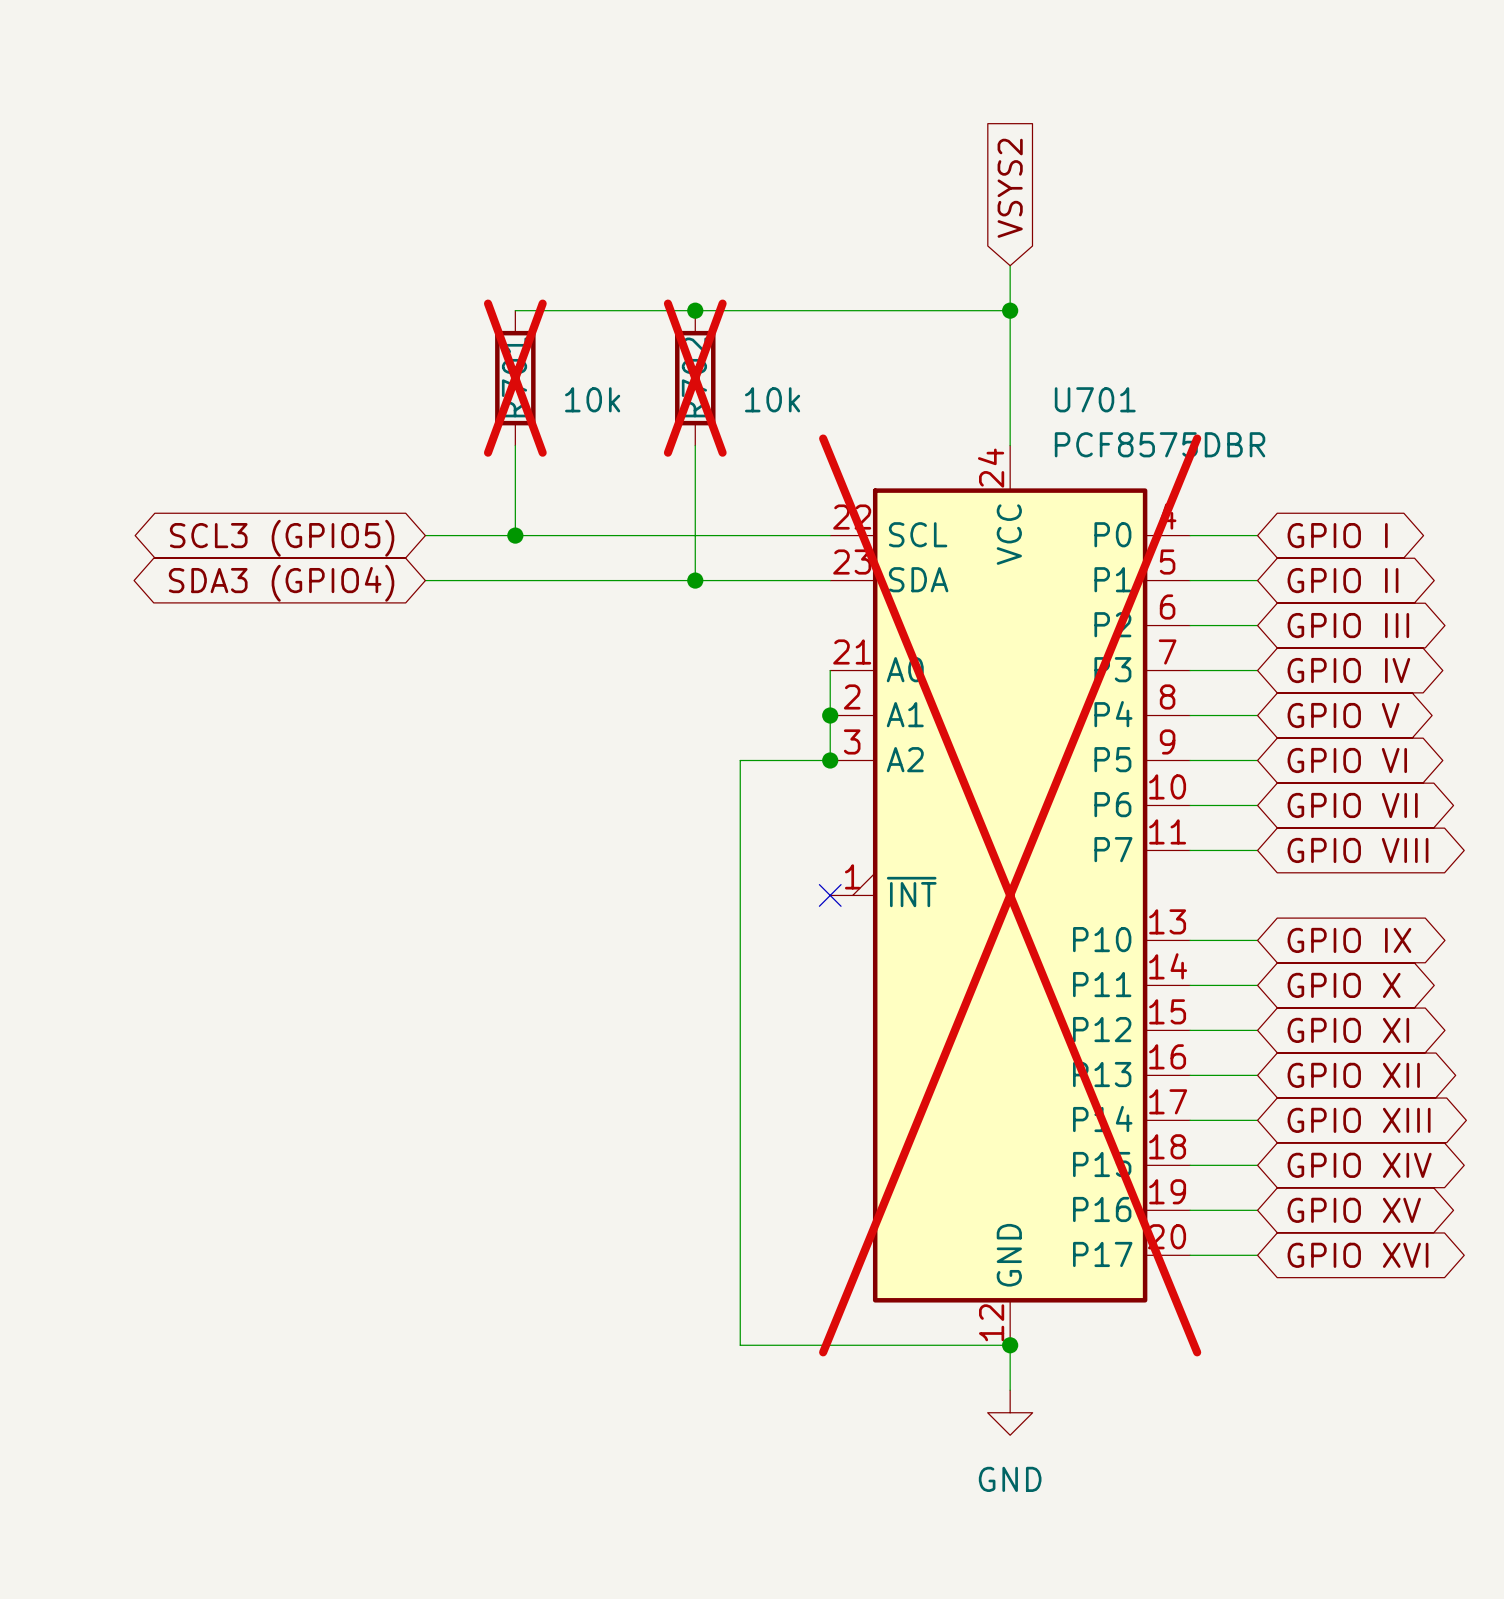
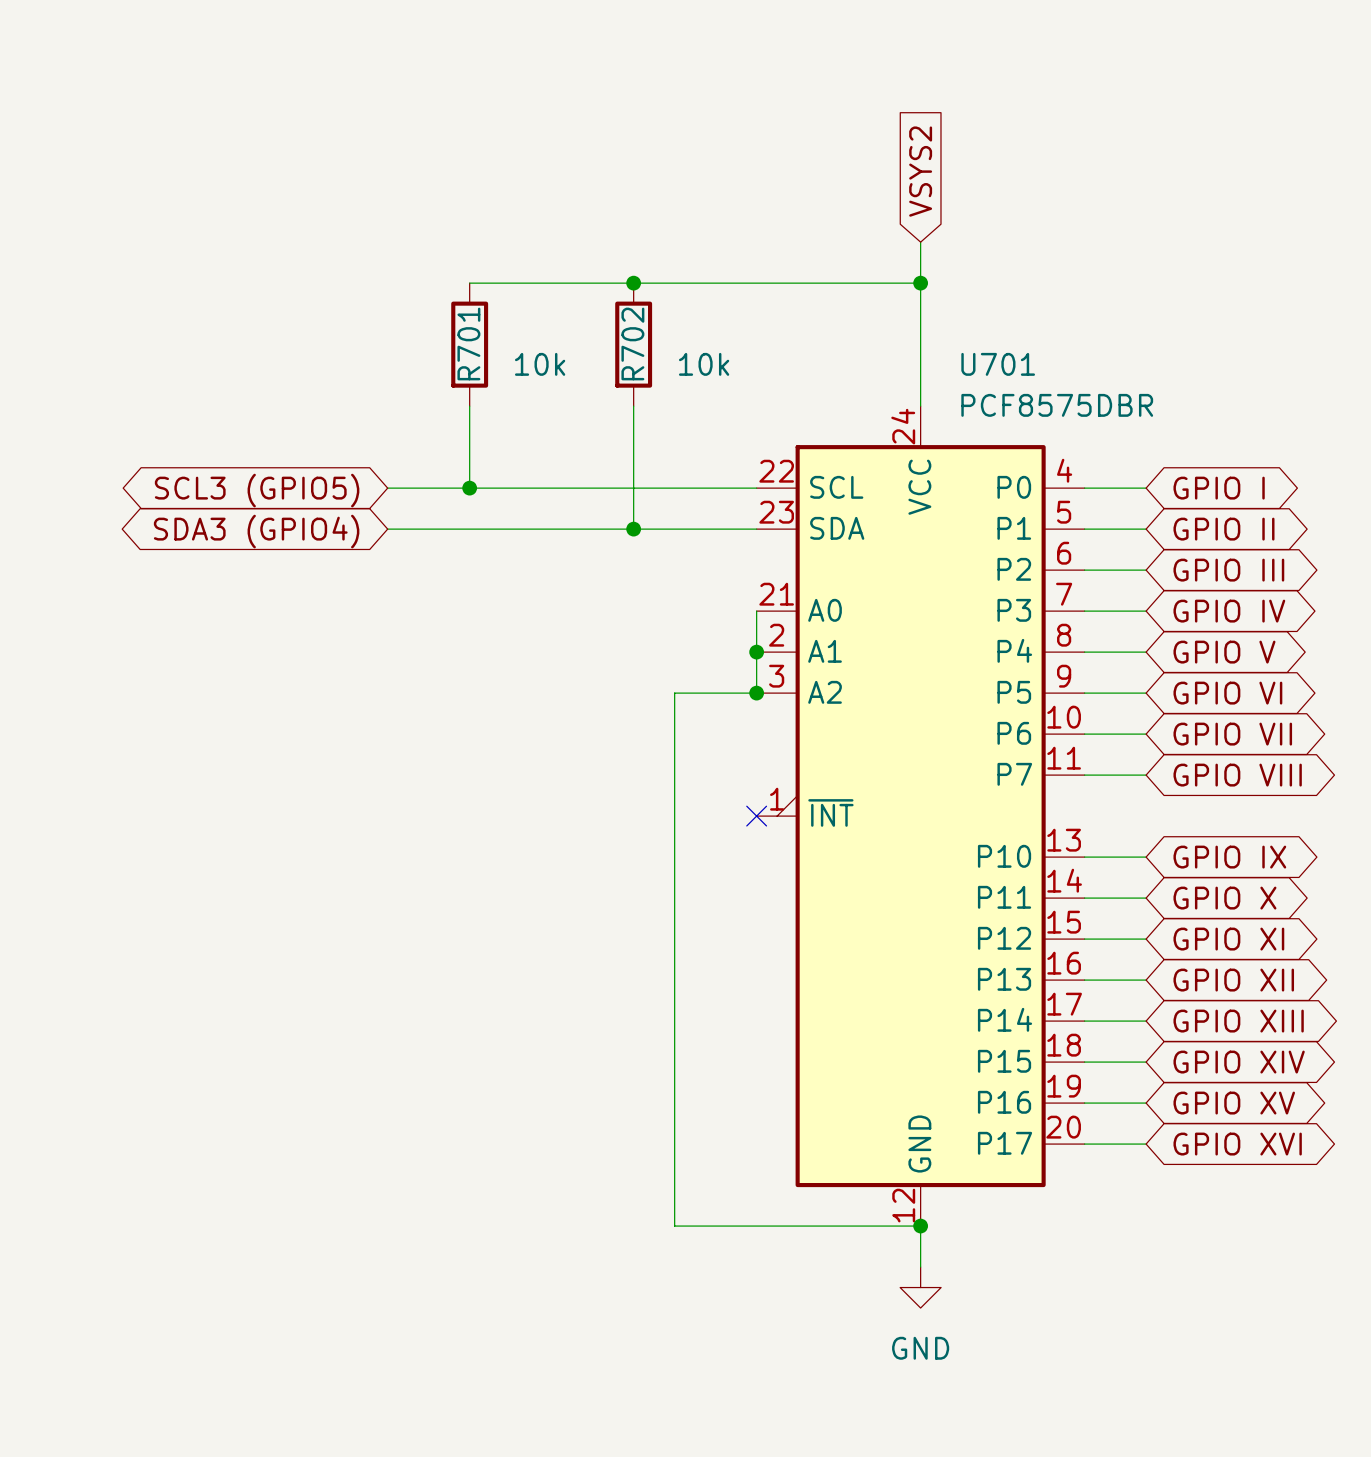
R701 do-not-place cross: (515, 378) -> none
R702 do-not-place cross: (695, 378) -> none
U701 do-not-place cross: (1010, 895) -> none

